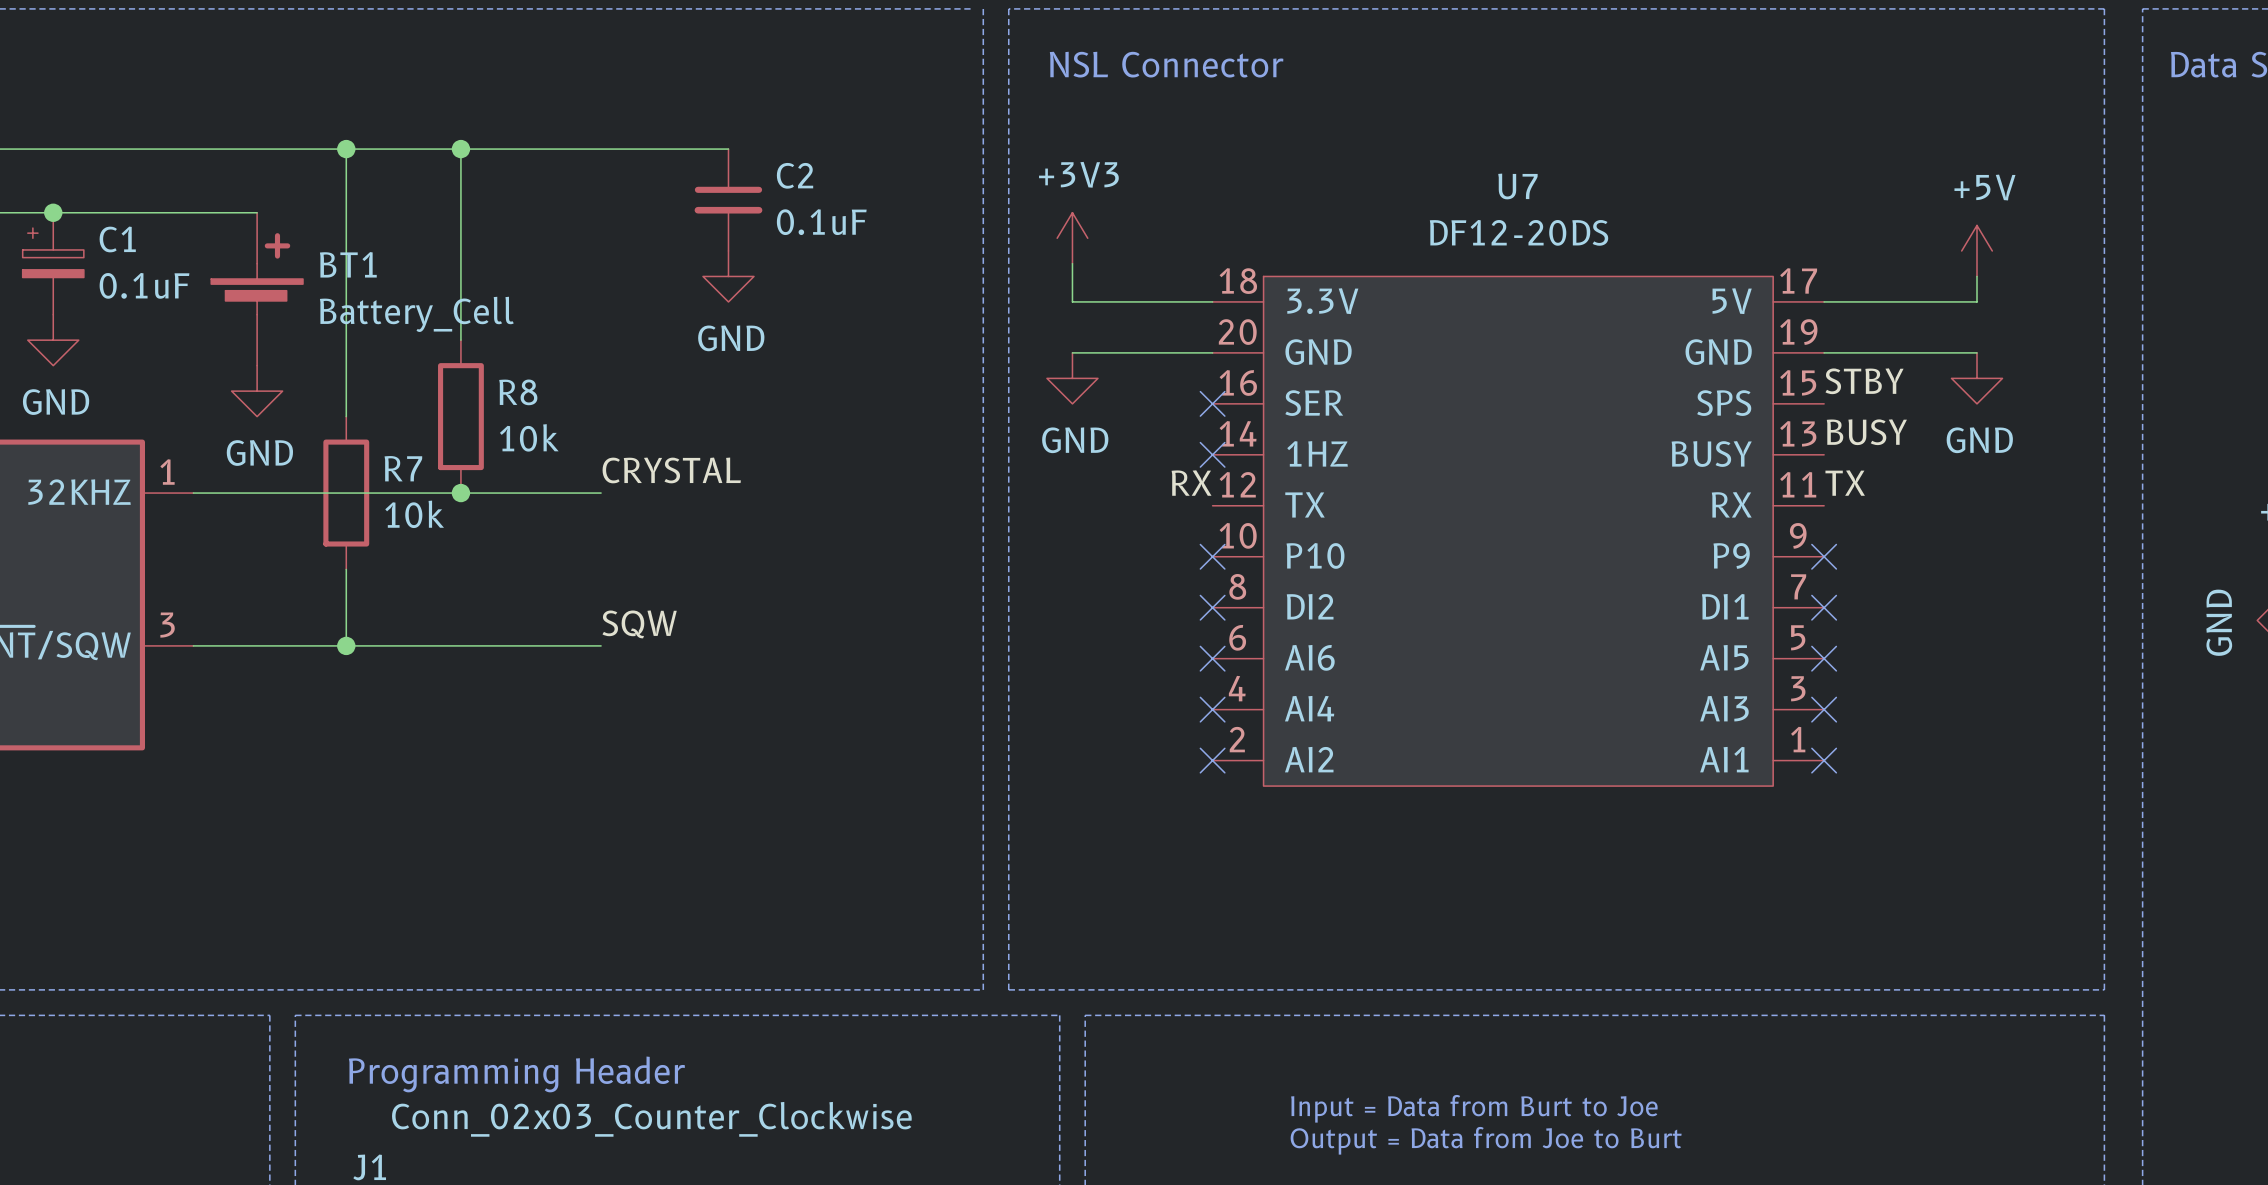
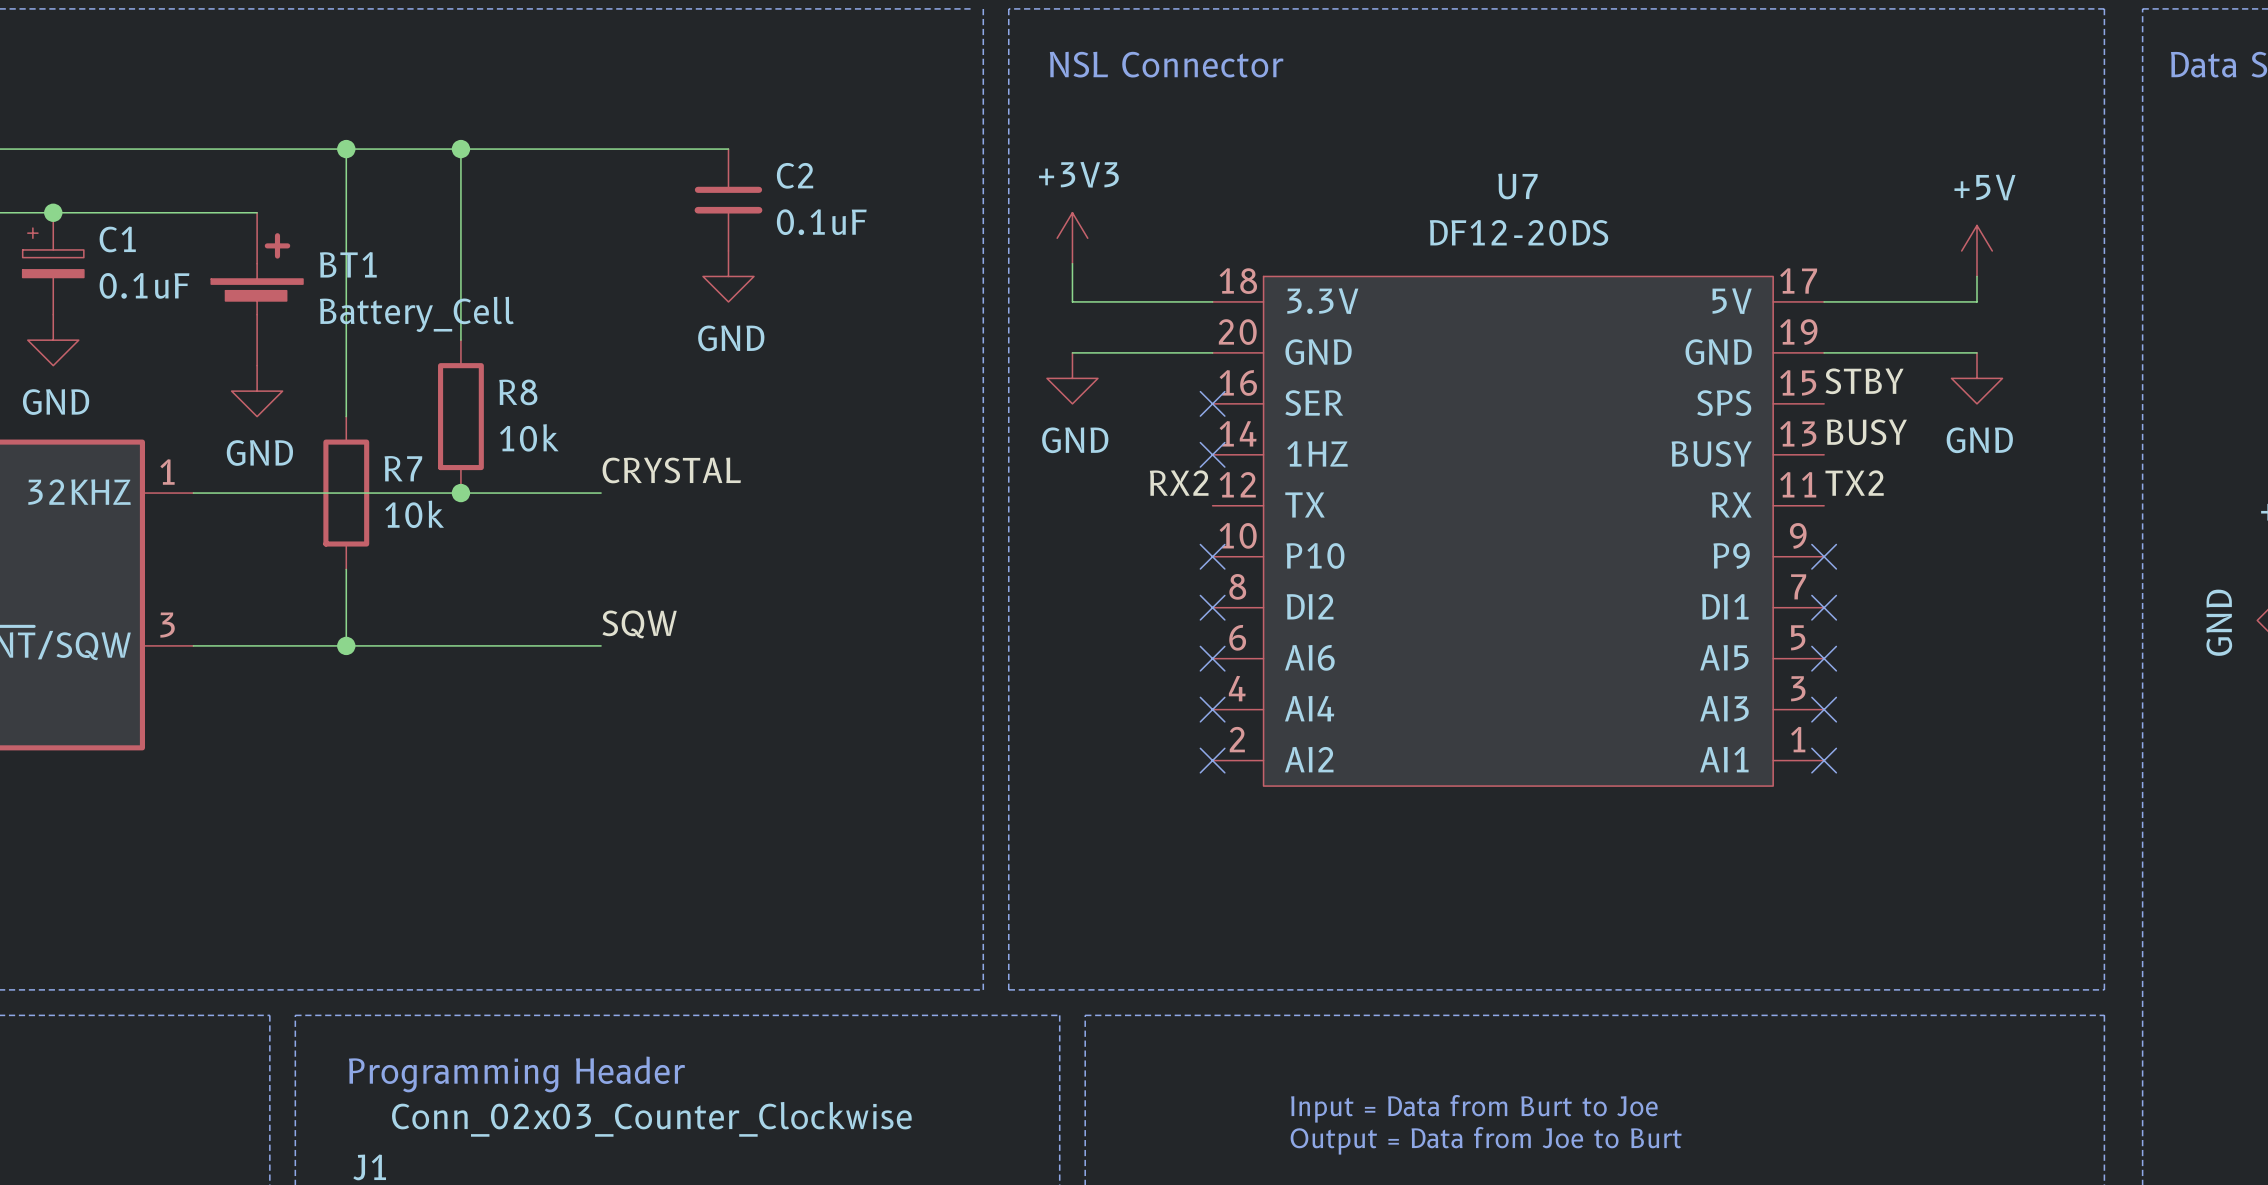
label: RX (1191, 483) -> RX2 (1179, 483)
label: TX (1845, 483) -> TX2 (1854, 483)

